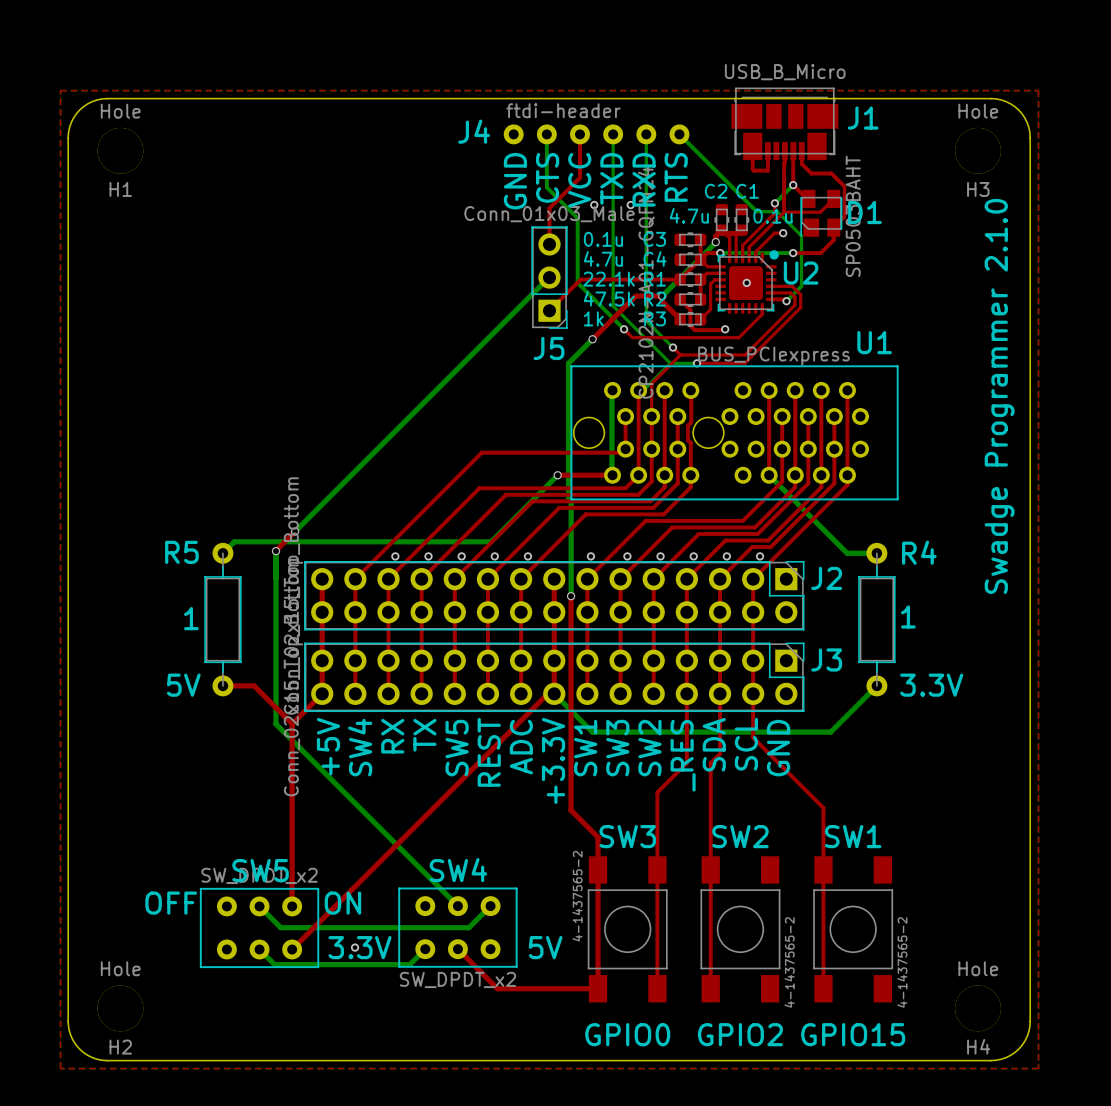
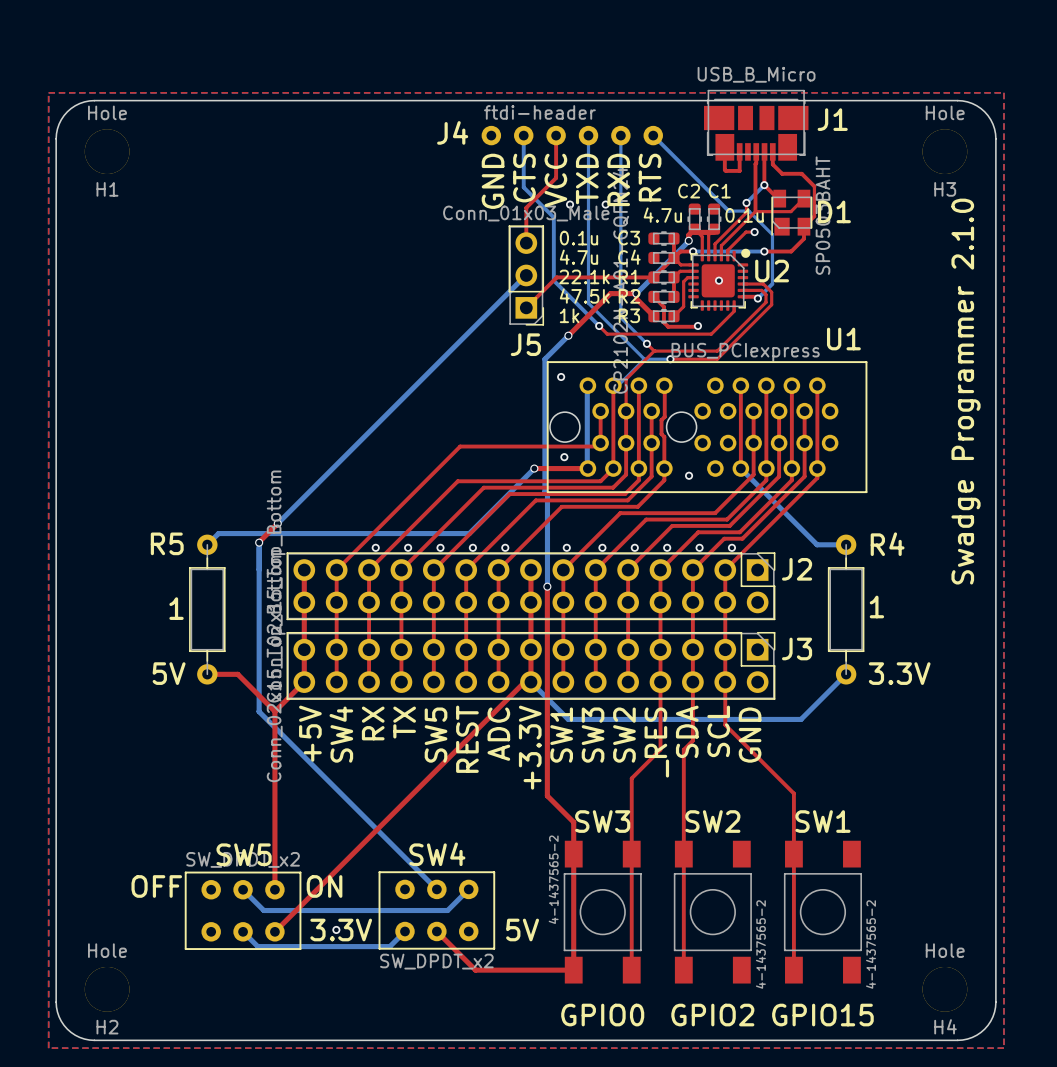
via: none -> (561, 376)
via: none -> (564, 457)
via: none -> (689, 475)

